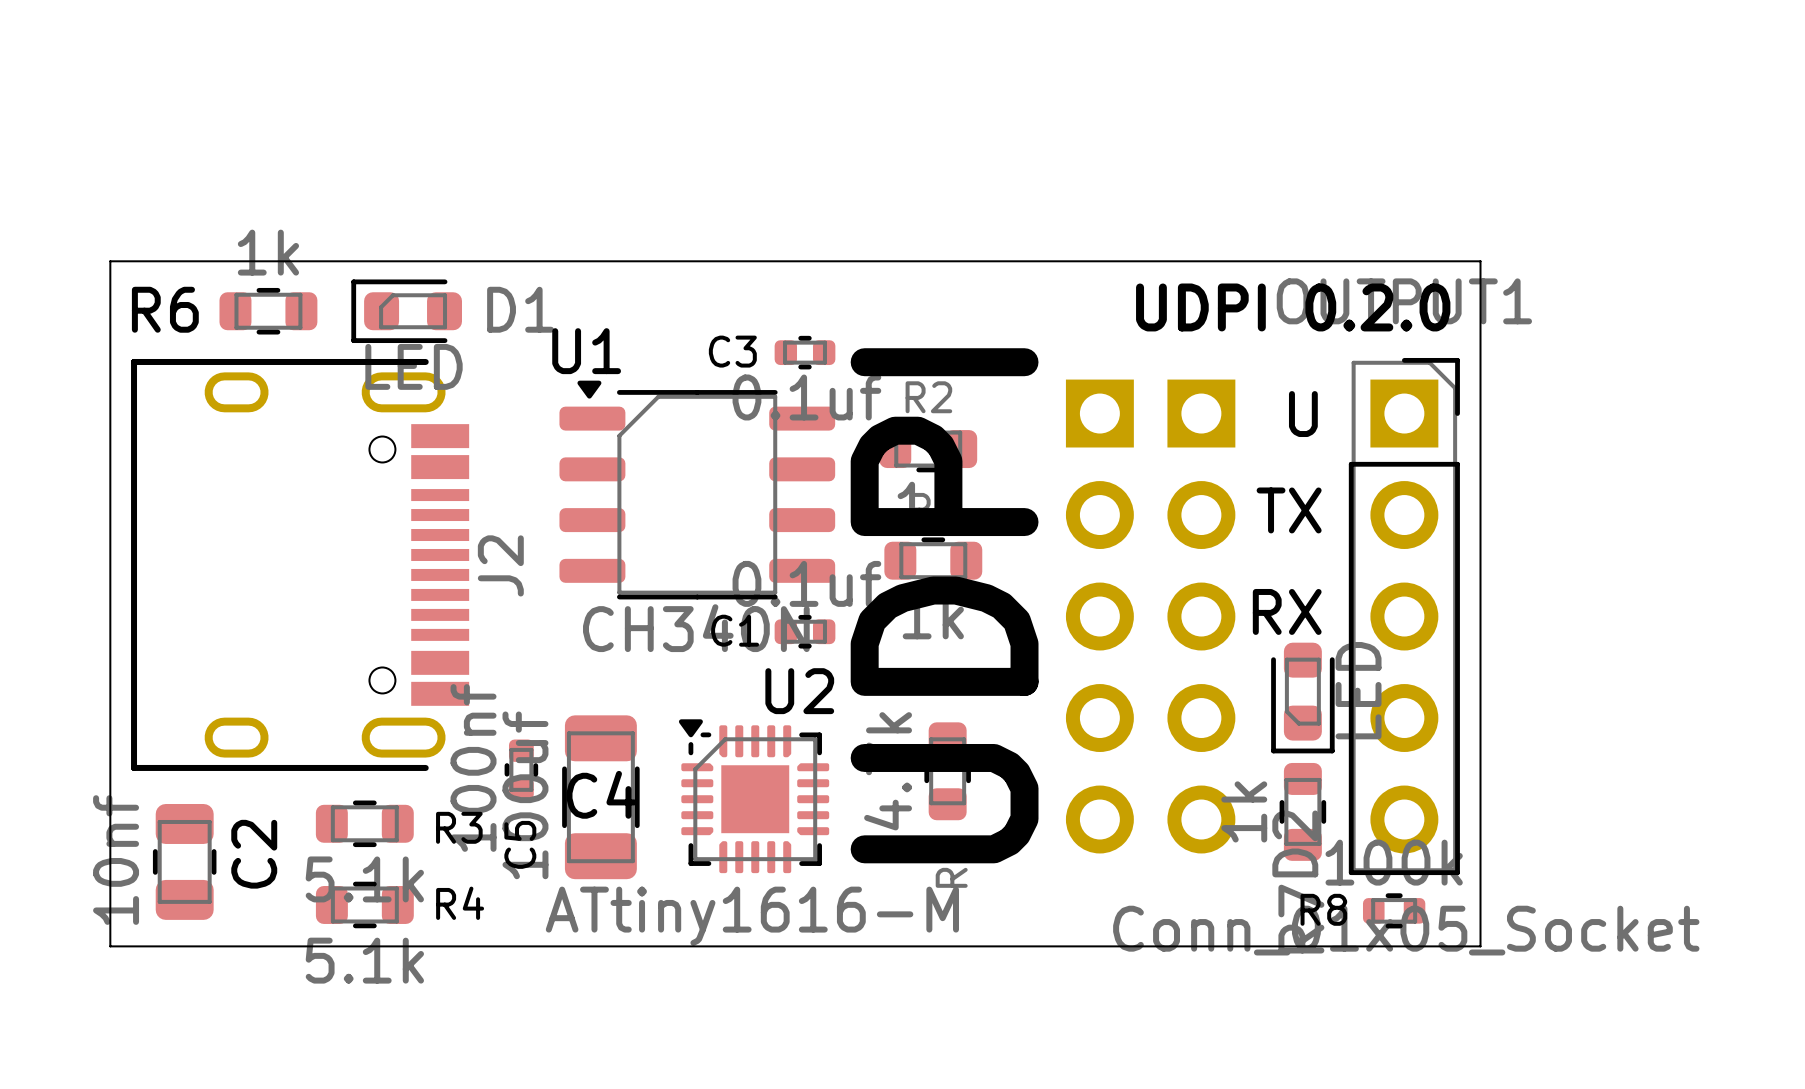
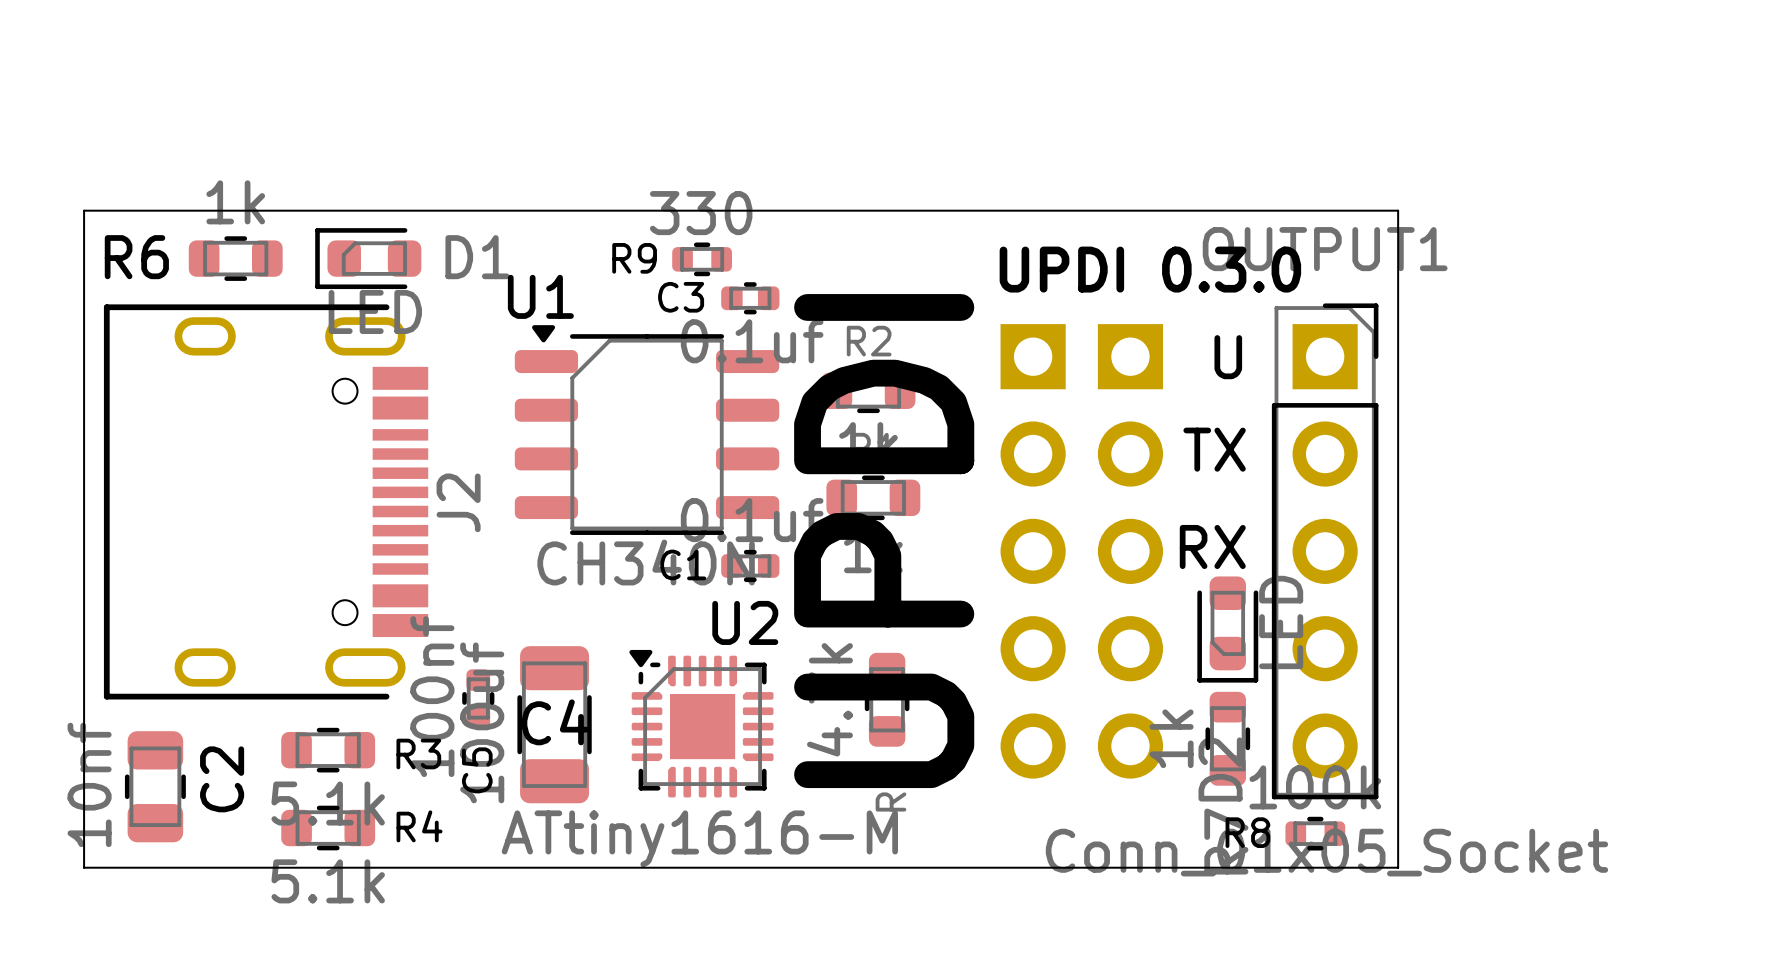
text: UDPI 0.2.0 (1293, 307) -> UPDI 0.3.0 (1150, 269)
R9: none -> 330 (702, 259)
text: UDPI (944, 605) -> UPDI (884, 541)

